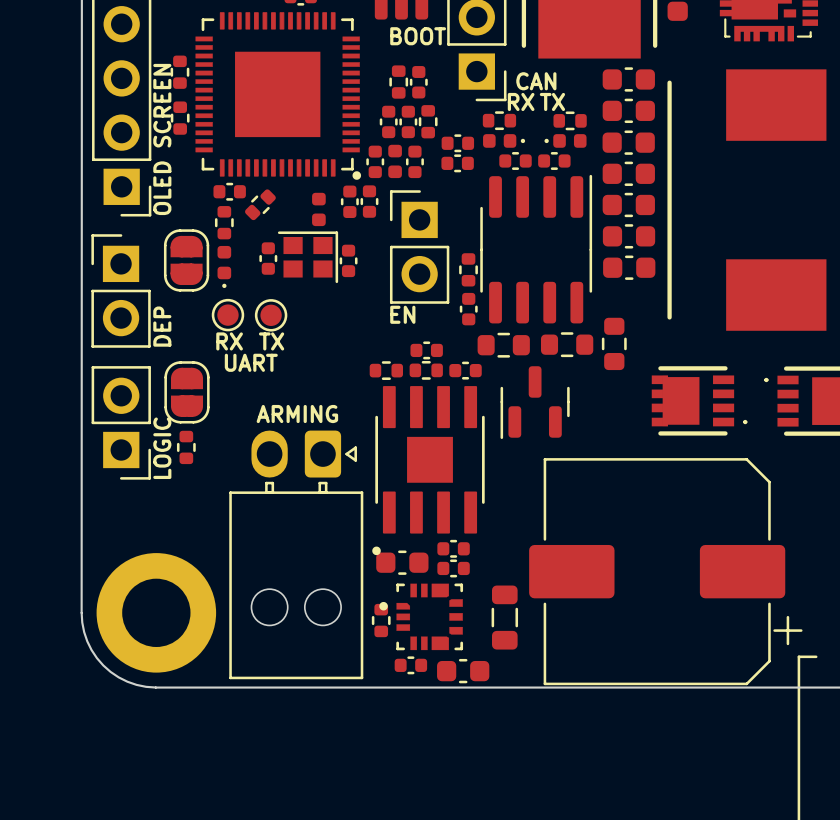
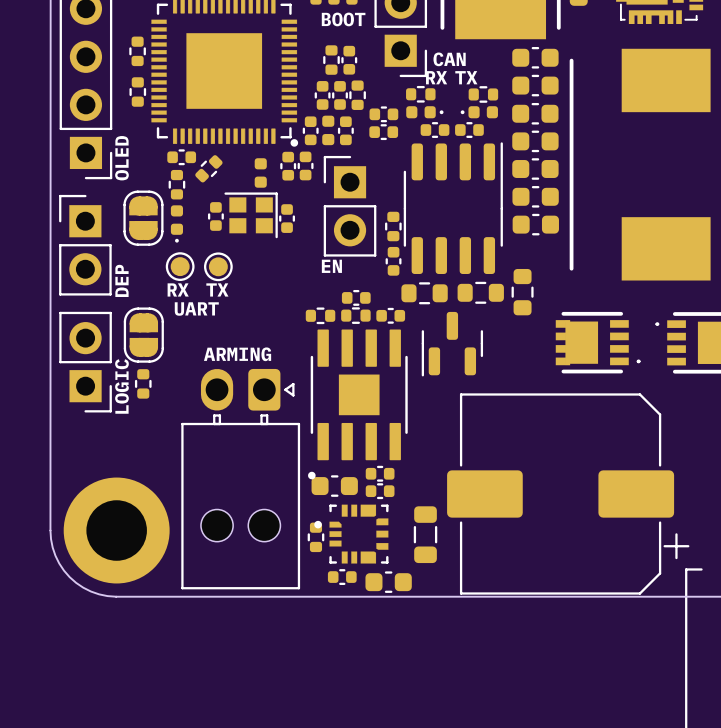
text: OLED SCREEN (162, 139) -> OLED (121, 158)

